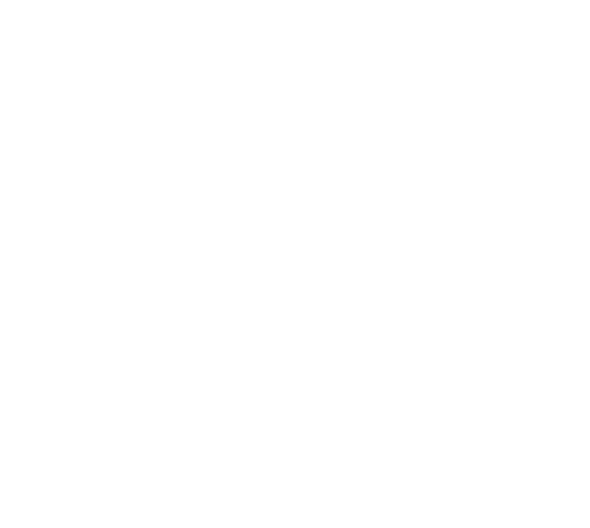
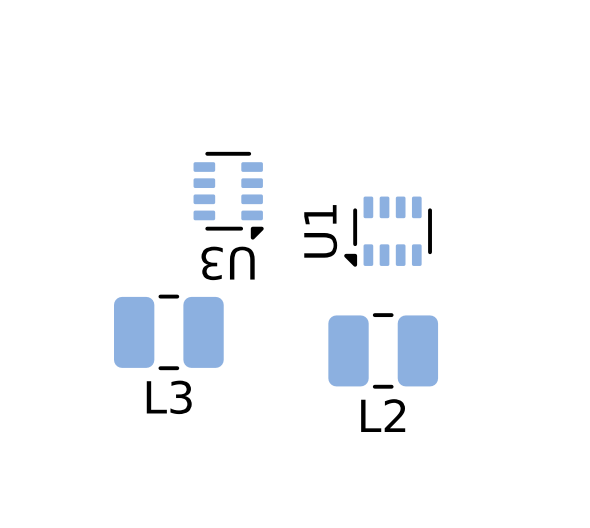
U3: none -> (228, 195)
U1: none -> (388, 231)
L3: none -> (168, 332)
L2: none -> (383, 350)

